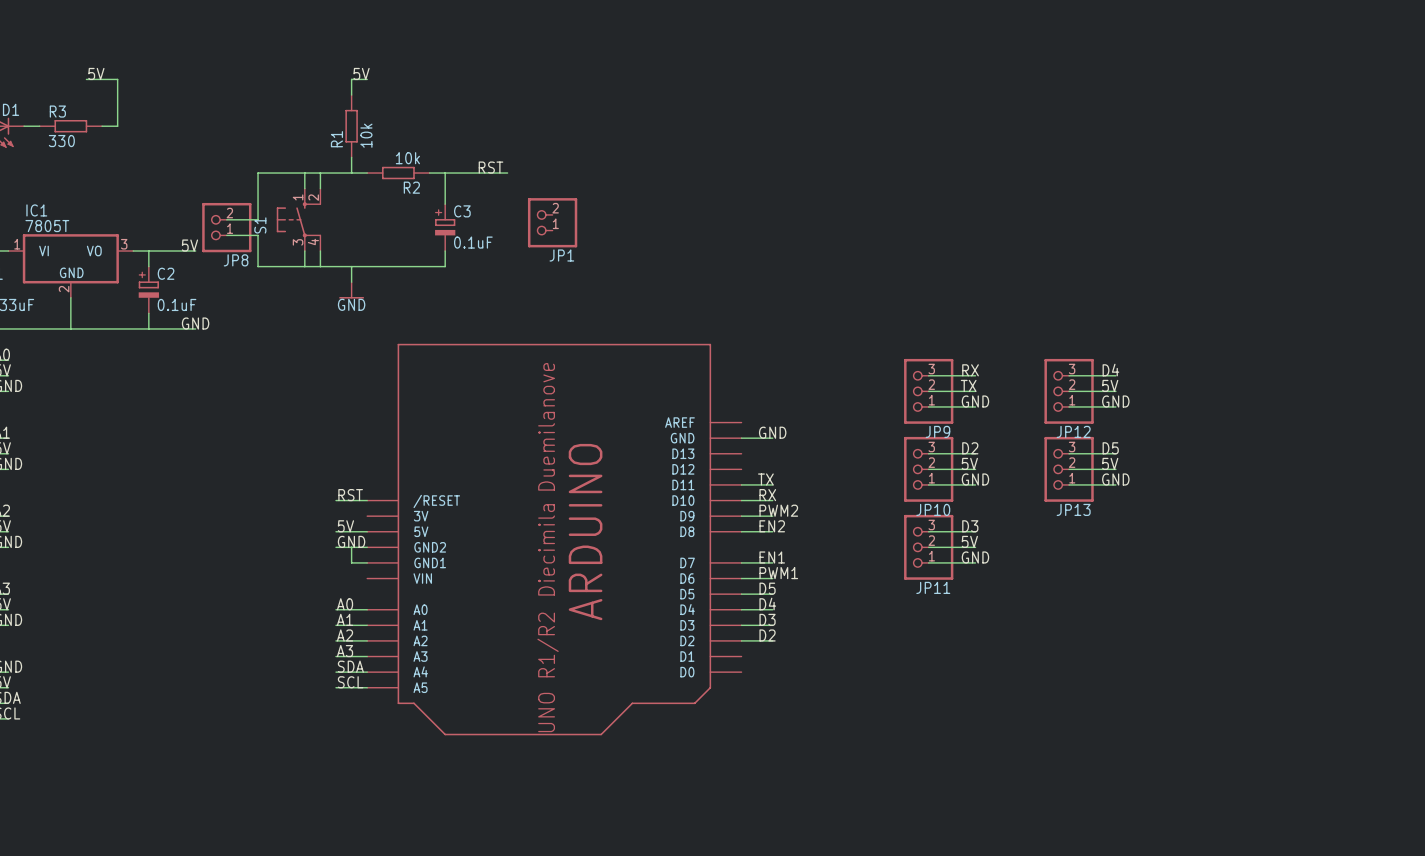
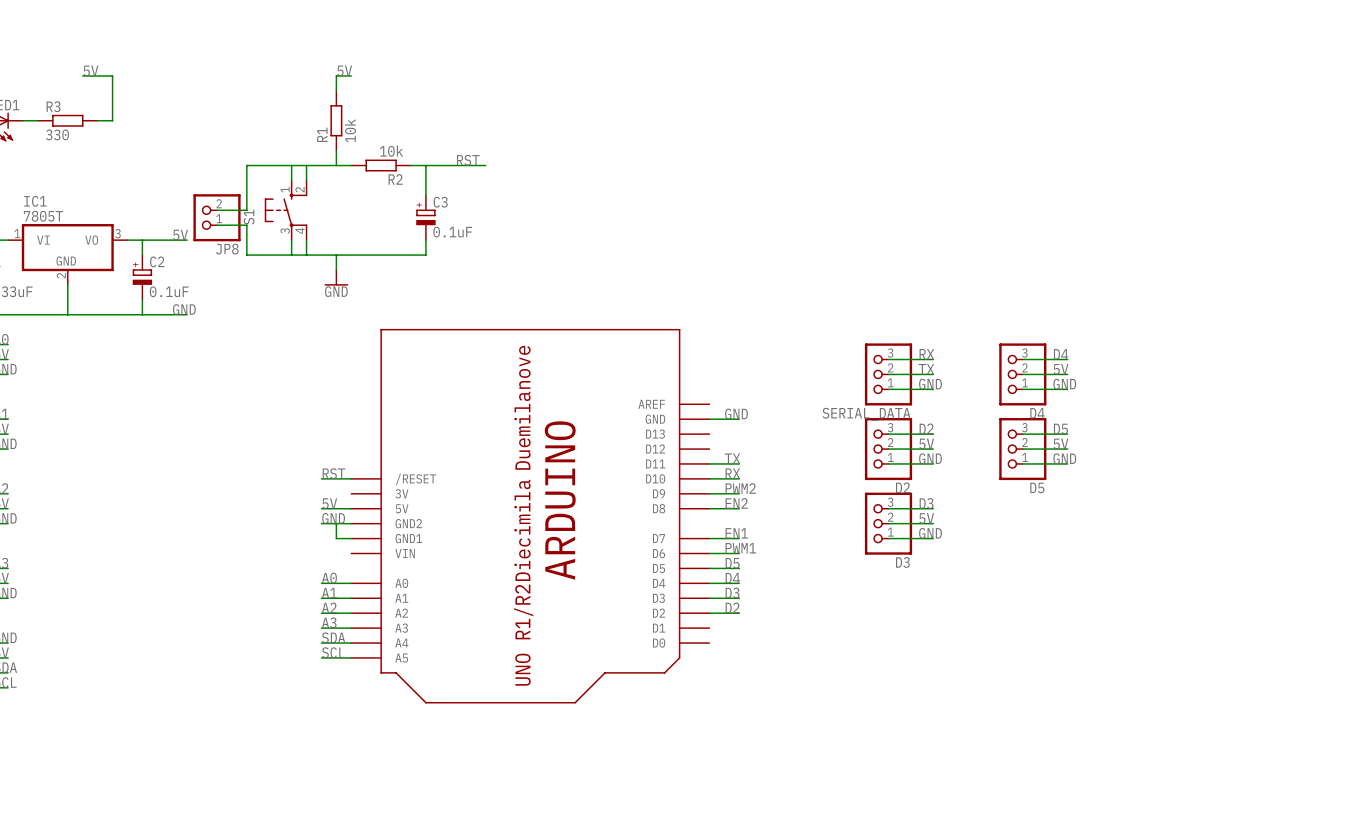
JP1: (552, 222) -> none
JP9 name: JP9 (937, 431) -> SERIAL_DATA (866, 414)
JP12 name: JP12 (1073, 431) -> D4 (1037, 413)
JP10 name: JP10 (933, 509) -> D2 (903, 487)
JP13 name: JP13 (1073, 509) -> D5 (1037, 487)
JP11 name: JP11 (933, 587) -> D3 (902, 562)

